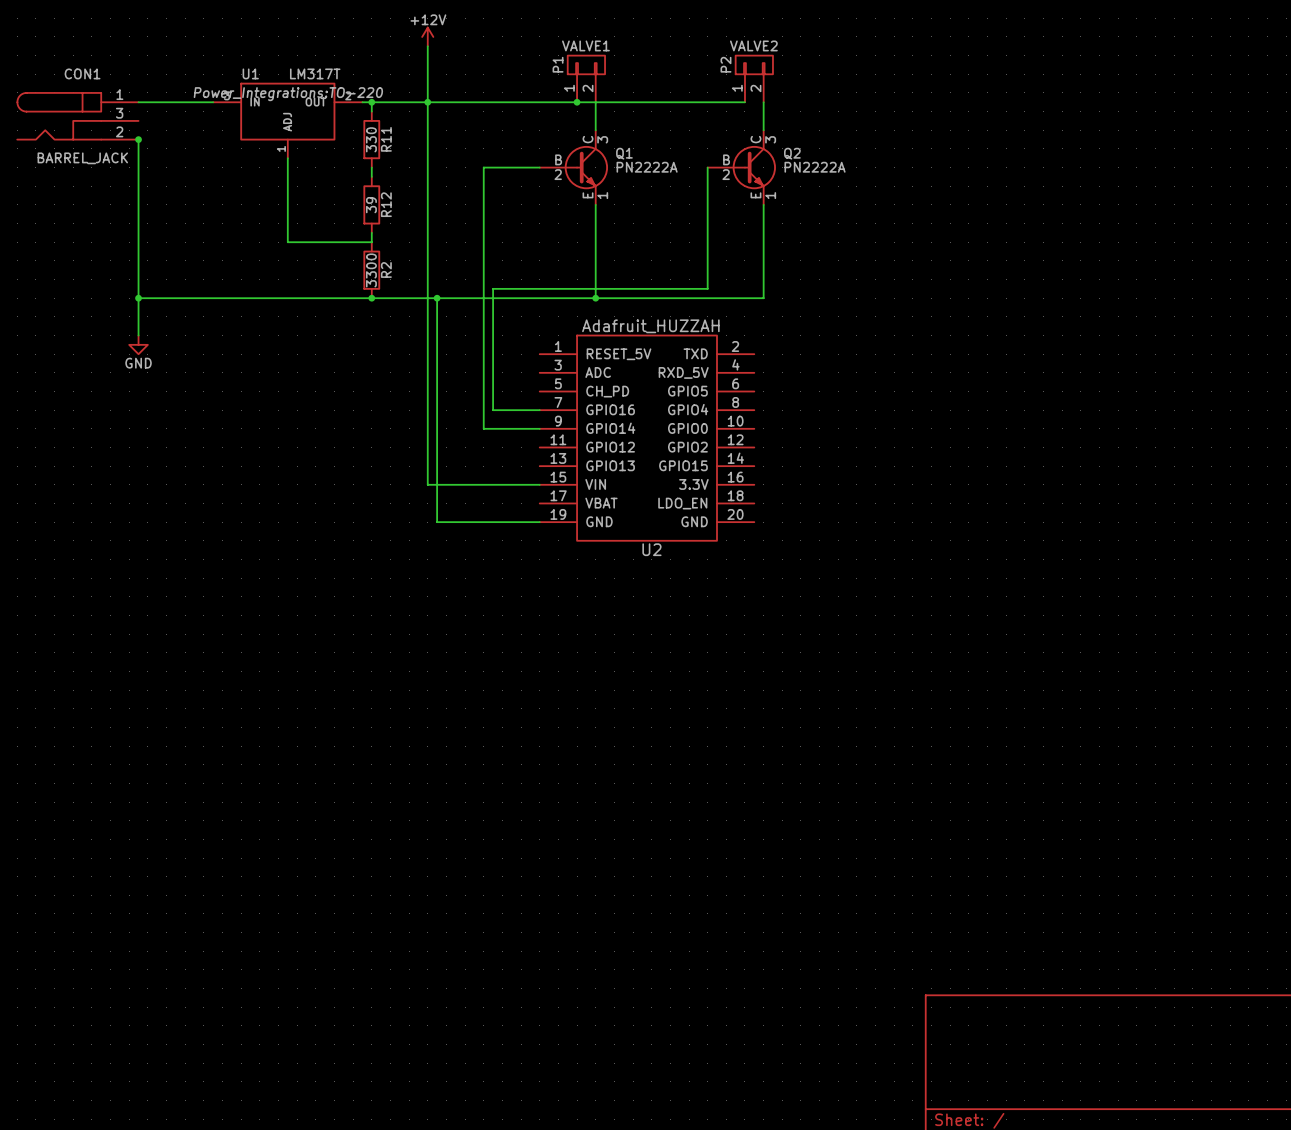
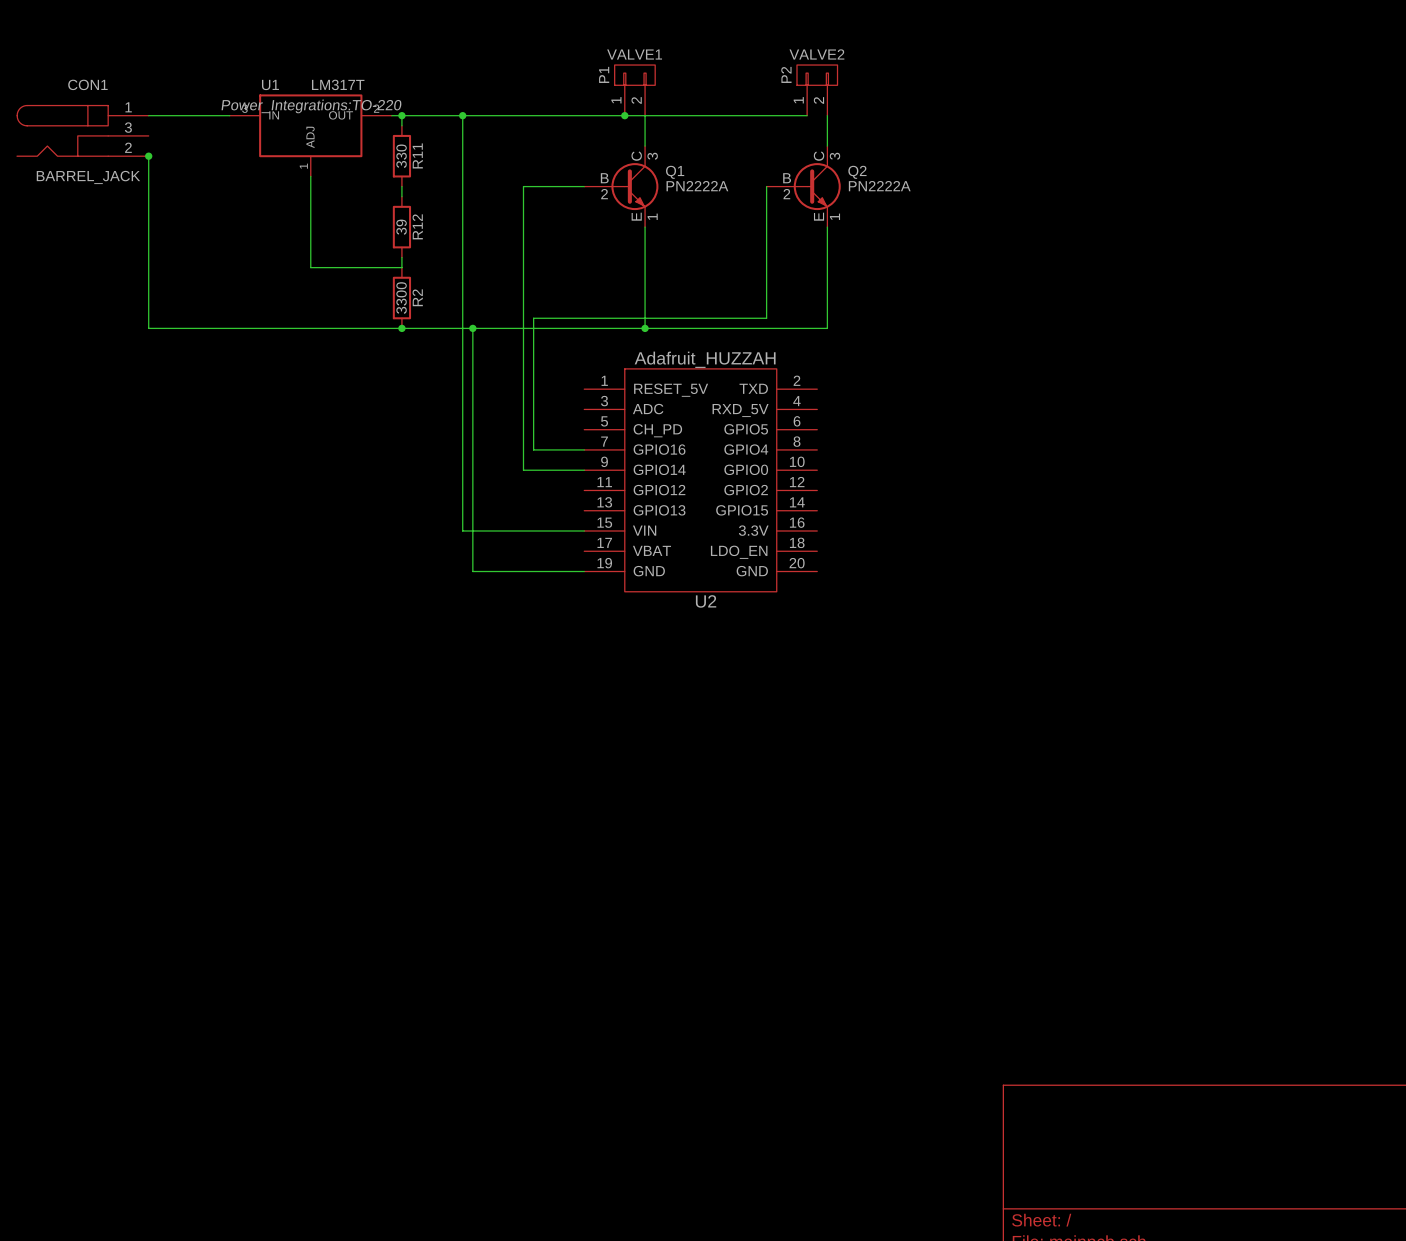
power symbol: +12V (427, 36) -> none
wire: (427, 46) (427, 102) -> none
wire: (138, 298) (138, 335) -> none
junction: (138, 298) -> none
power symbol: GND (138, 344) -> none

